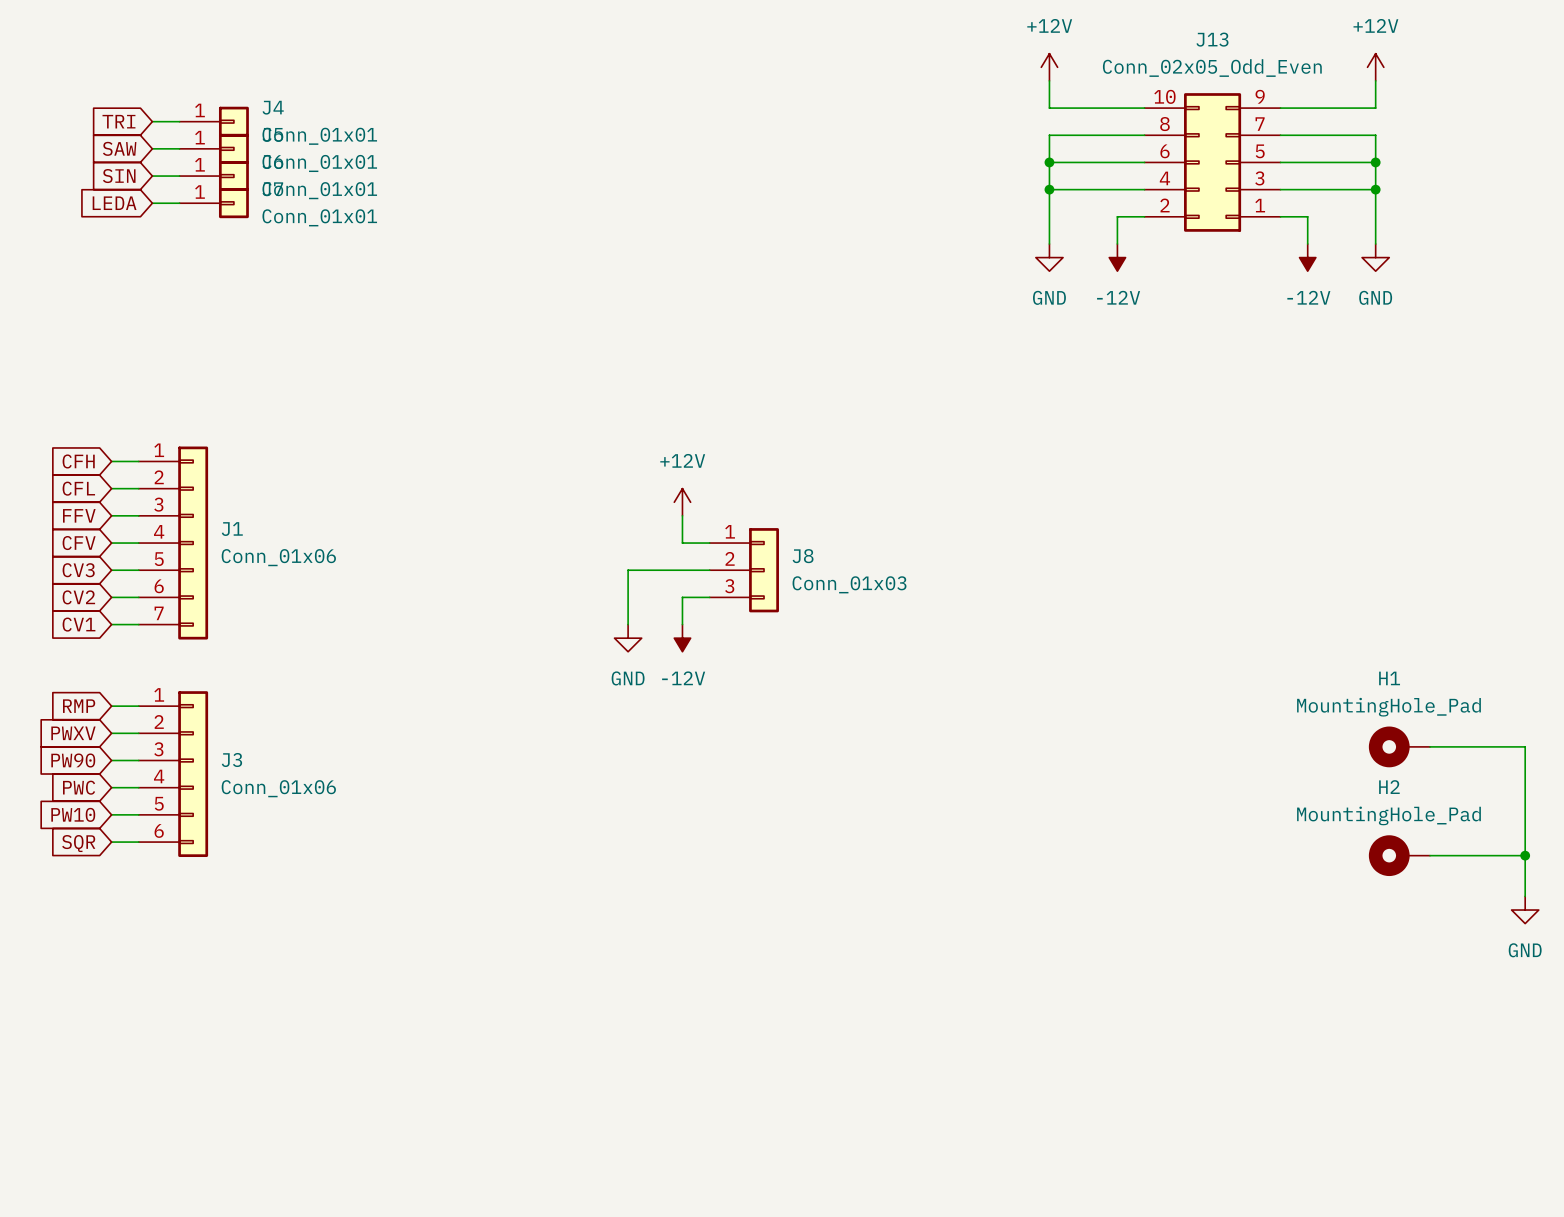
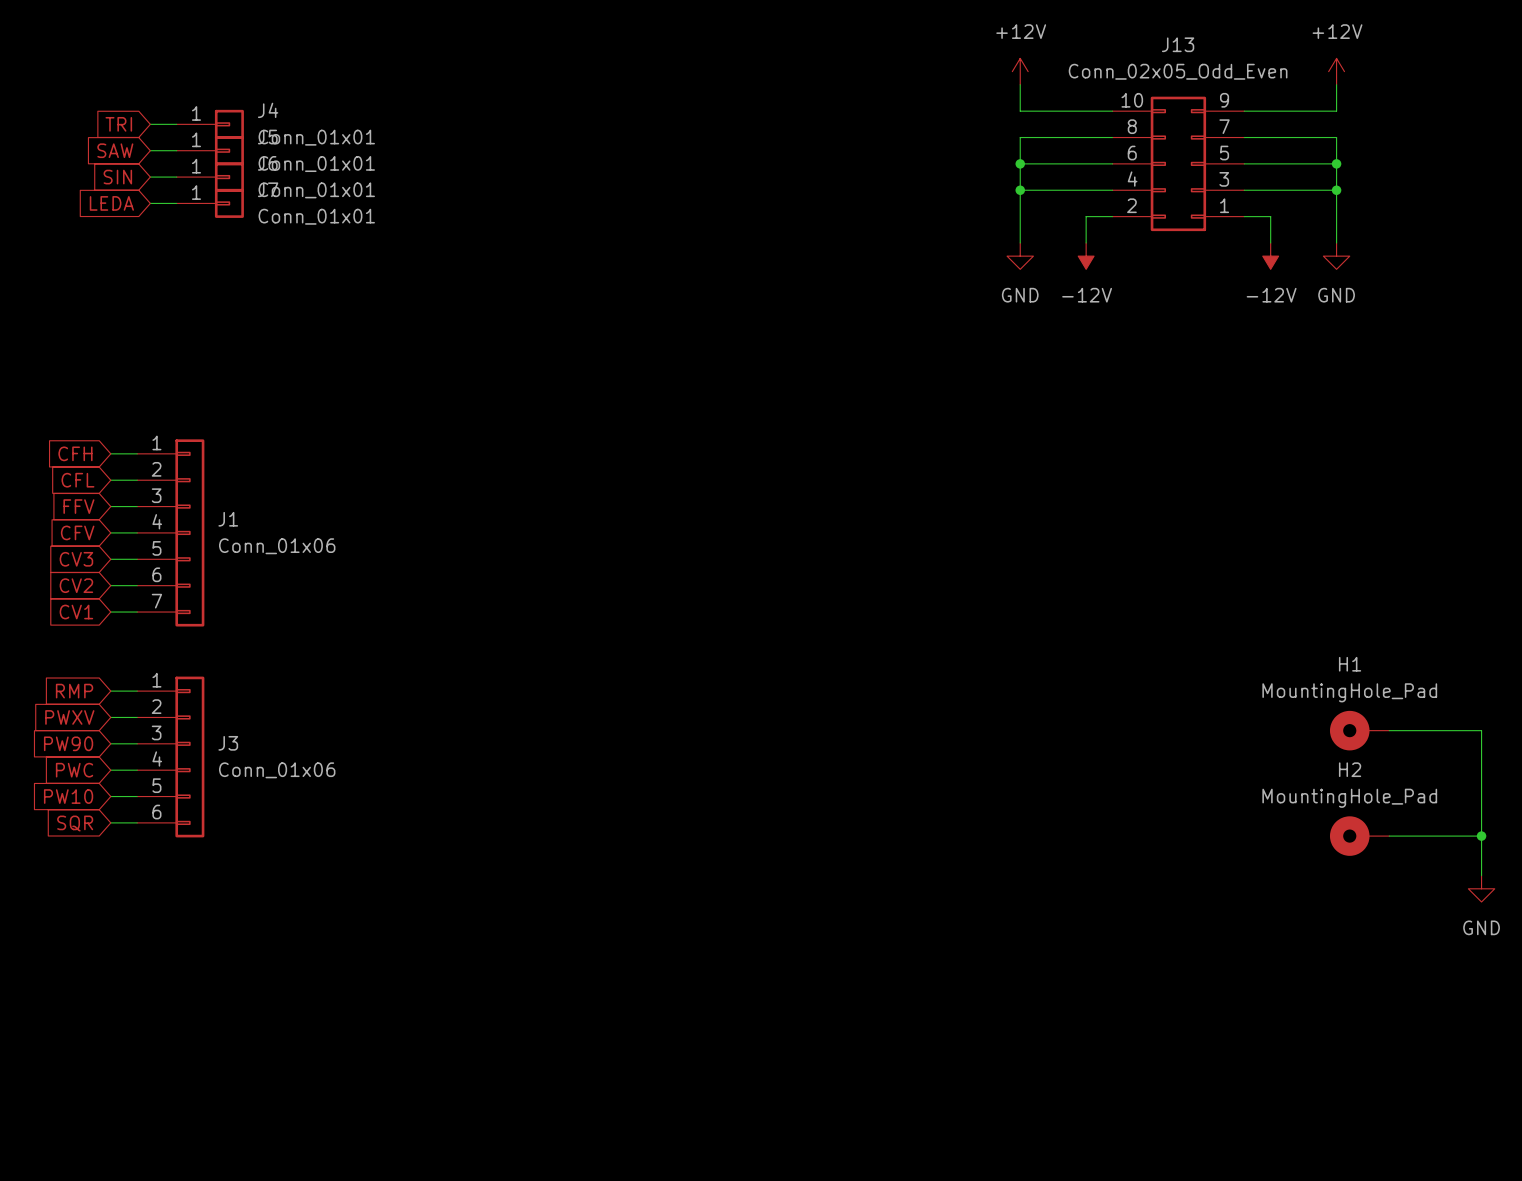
power symbol: +12V (682, 502) -> none
wire: (682, 515) (682, 543) (709, 543) -> none
wire: (709, 570) (628, 570) (628, 624) -> none
J8: Conn_01x03 (744, 570) -> none
wire: (709, 597) (682, 597) (682, 624) -> none
power symbol: GND (628, 638) -> none
power symbol: -12V (682, 638) -> none

